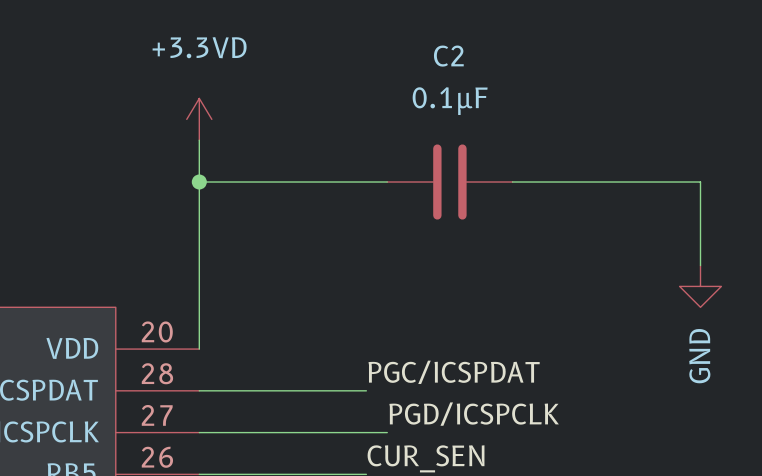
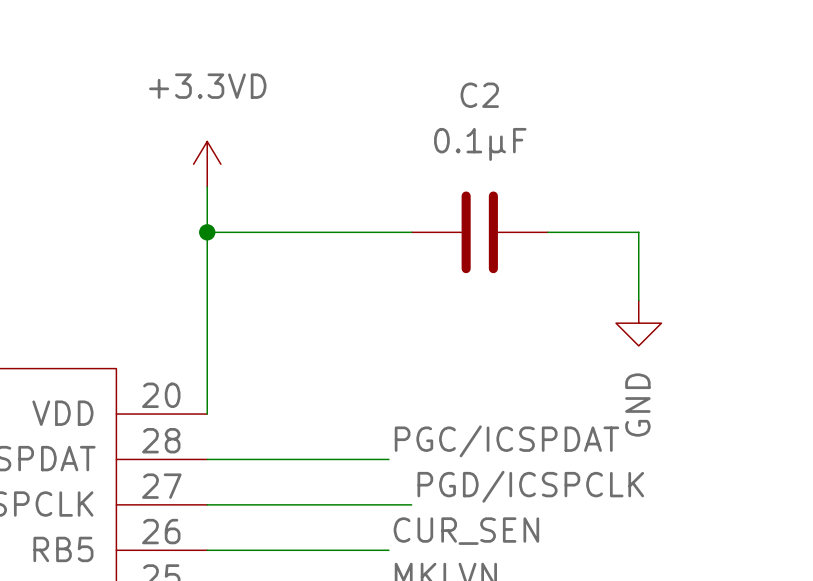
wire: (596, 182) (700, 182) (700, 265) -> (638, 232) (638, 300)
power symbol position: GND (700, 286) -> GND (638, 323)

